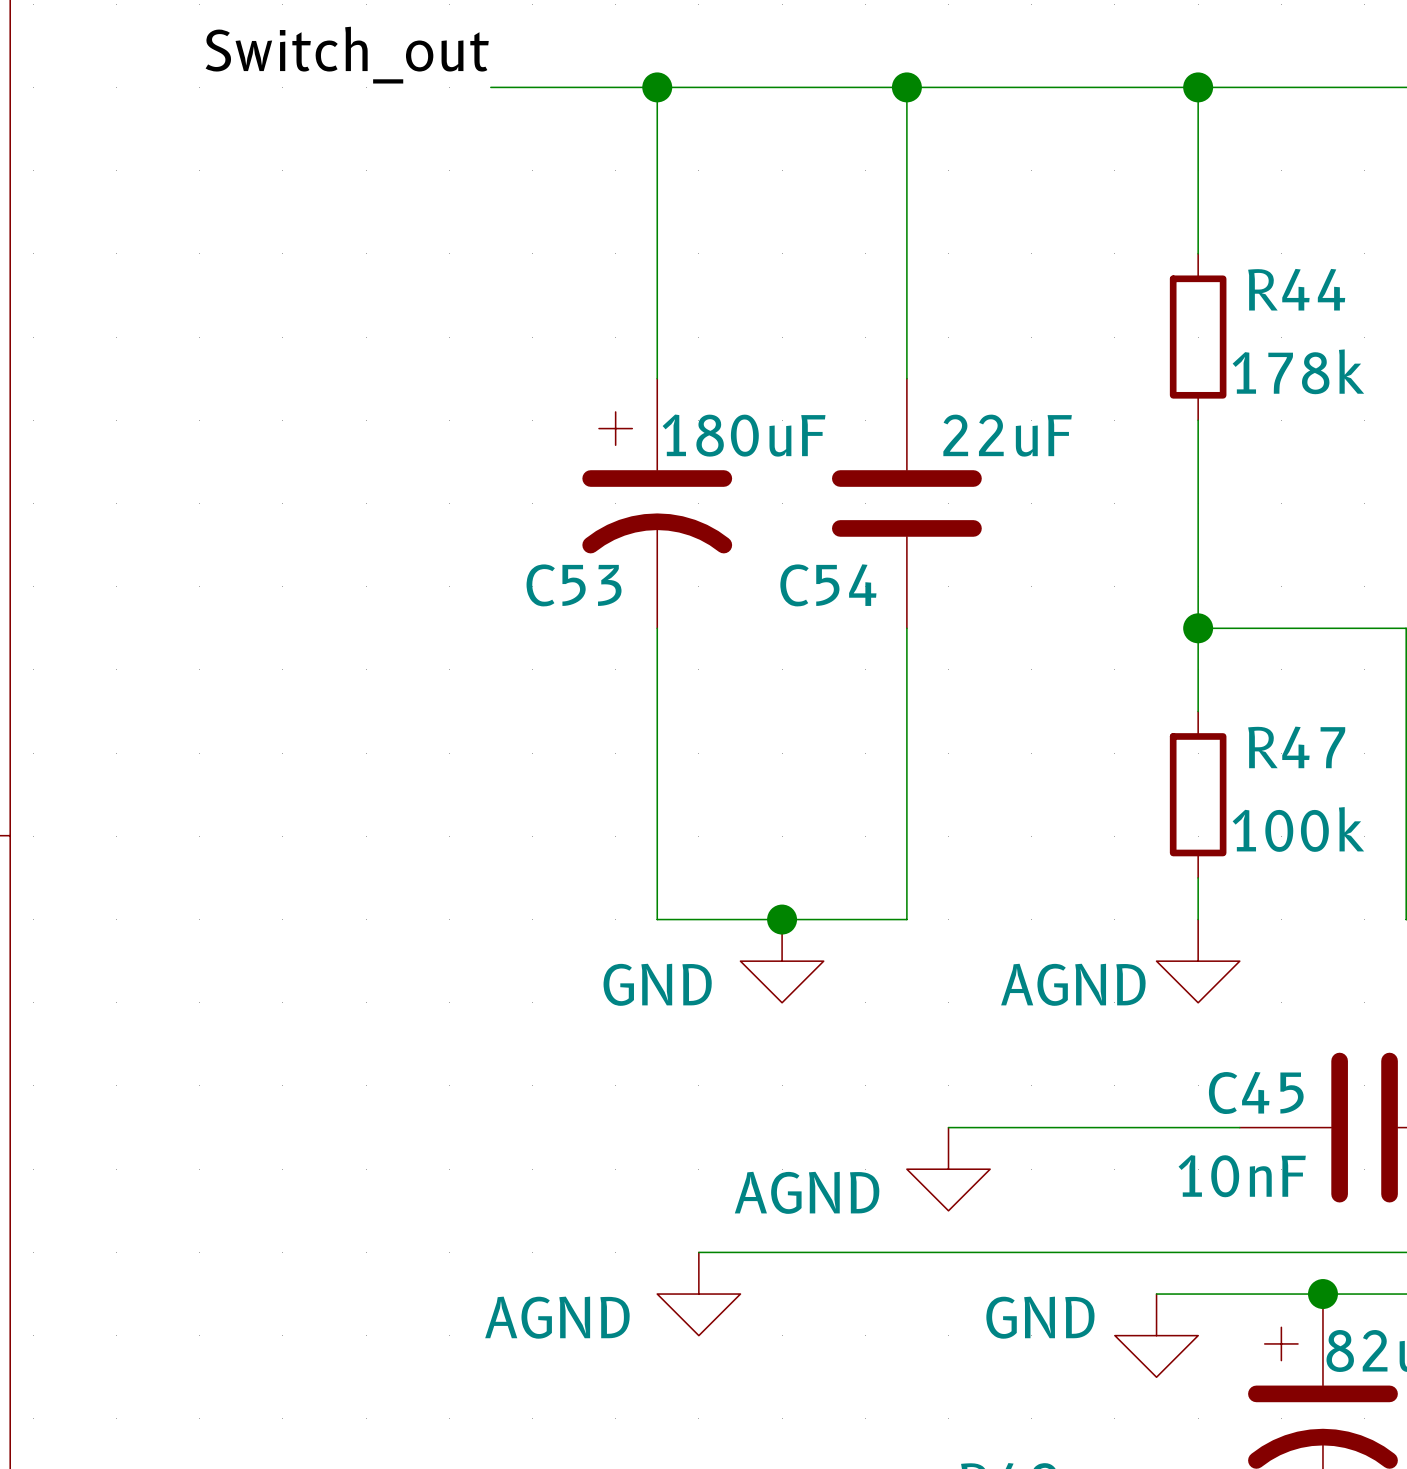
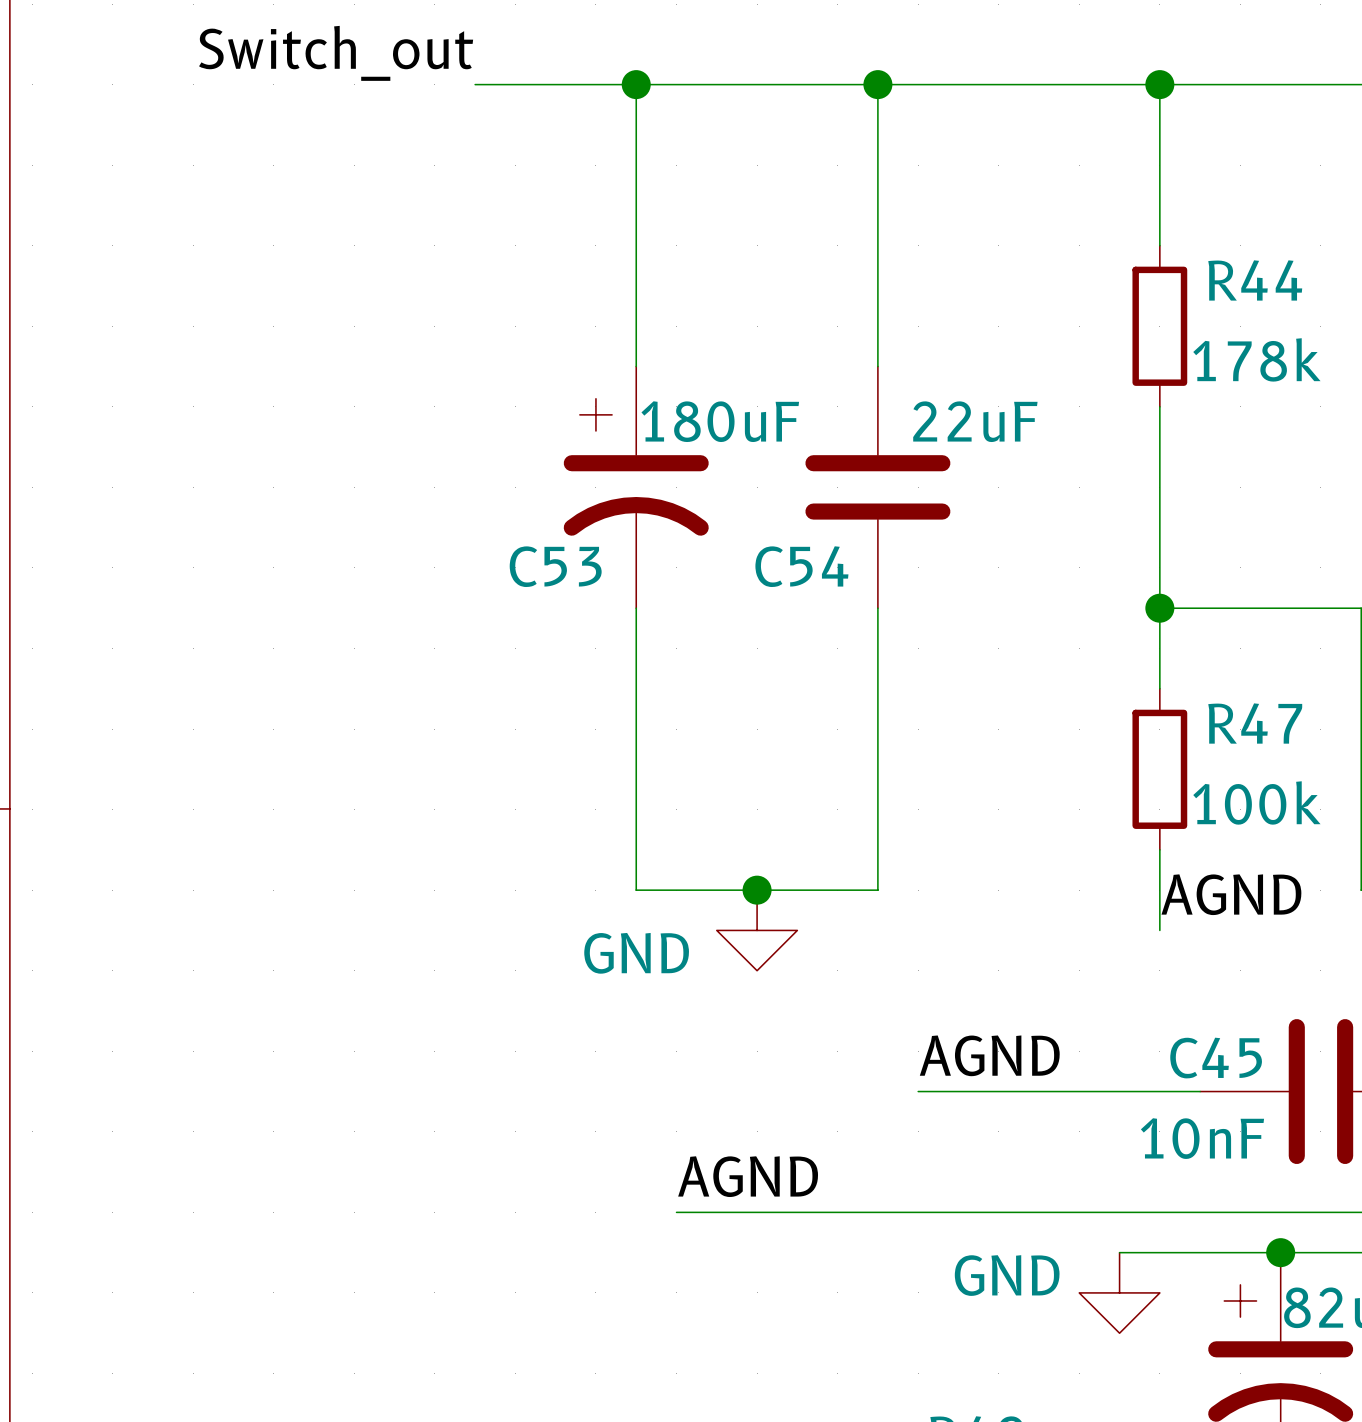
label: none -> AGND (1231, 894)
power symbol: AGND (1198, 961) -> none
label: none -> AGND (989, 1055)
power symbol: AGND (948, 1169) -> none
label: none -> AGND (748, 1176)
power symbol: AGND (698, 1294) -> none

